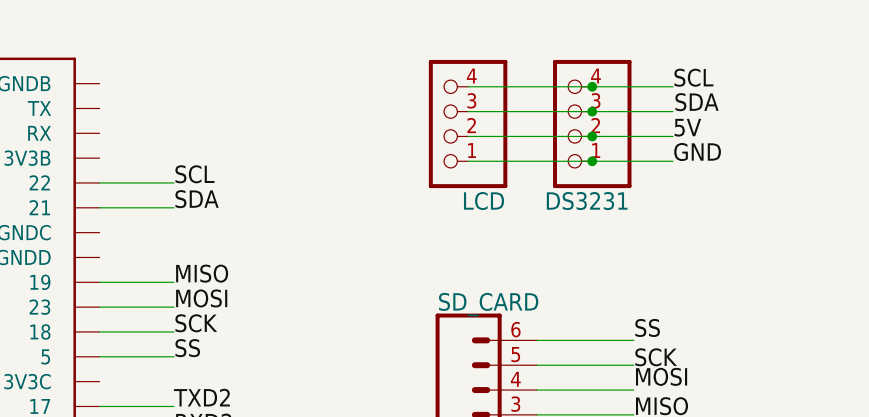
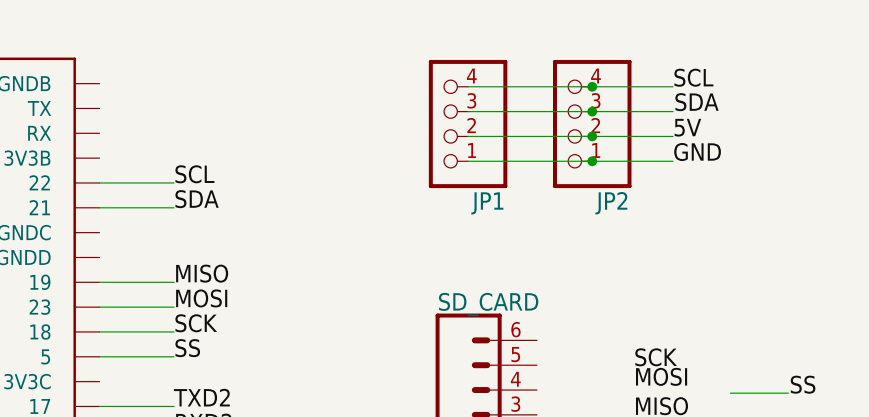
LCD name: LCD (484, 201) -> JP1 (487, 203)
DS3231 name: DS3231 (587, 201) -> JP2 (611, 203)
label position: SS (647, 327) -> SS (803, 384)
wire: (536, 340) (633, 340) -> none
wire: (536, 365) (633, 365) -> none
wire: (536, 390) (633, 390) -> none
wire: none -> (730, 393) (788, 393)
wire: (536, 414) (633, 414) -> none

